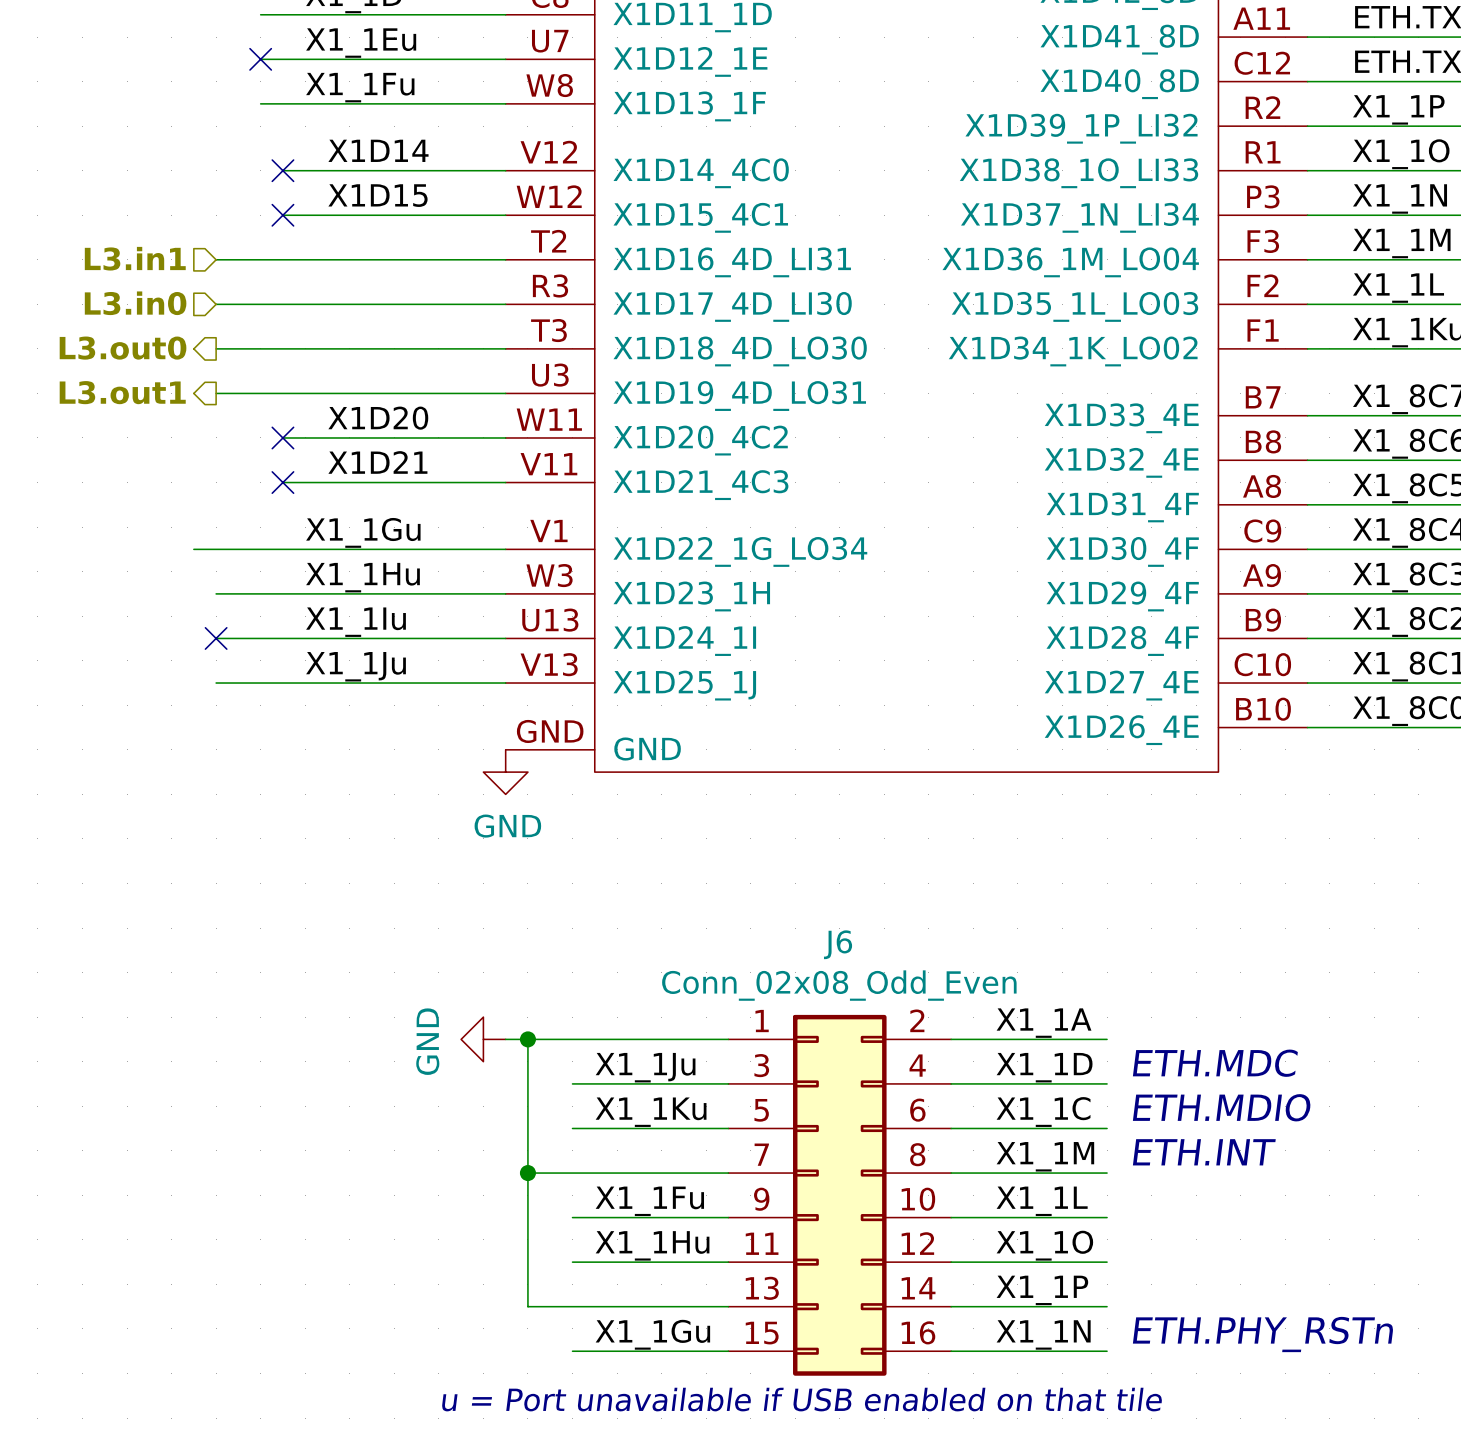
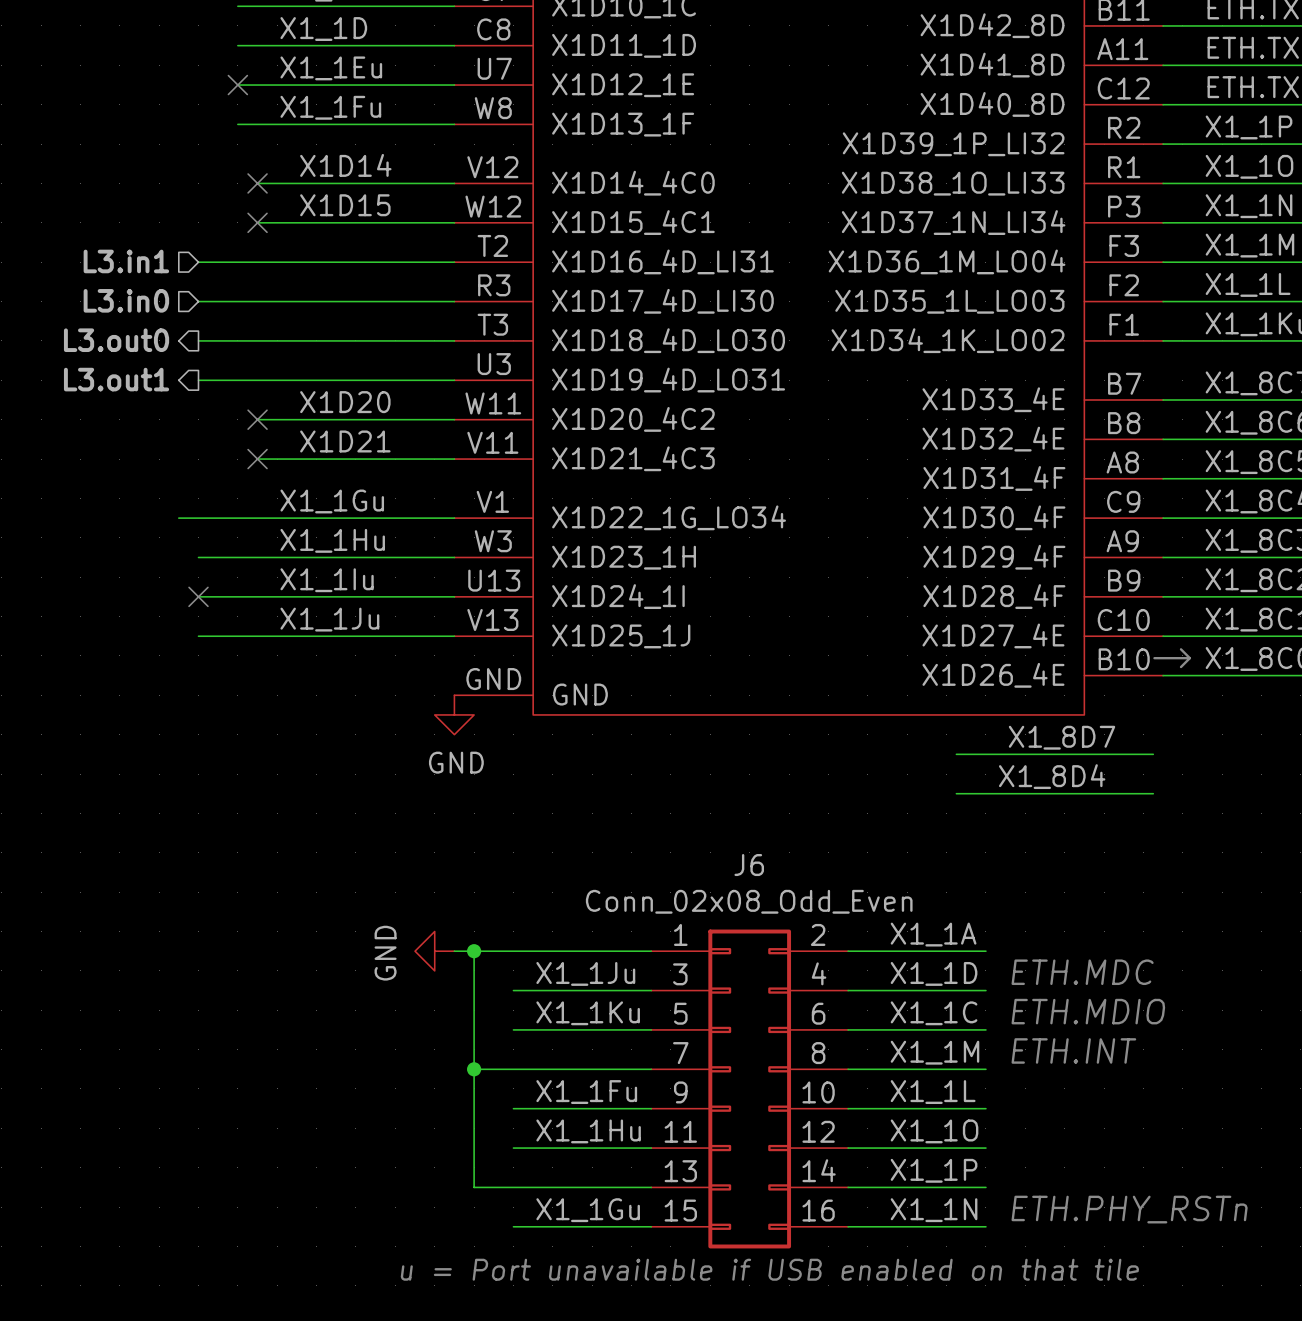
text: none -> → (1172, 658)
label: none -> X1_8D7 (1062, 737)
wire: none -> (956, 754) (1153, 754)
label: none -> X1_8D4 (1052, 776)
wire: none -> (956, 793) (1153, 793)

